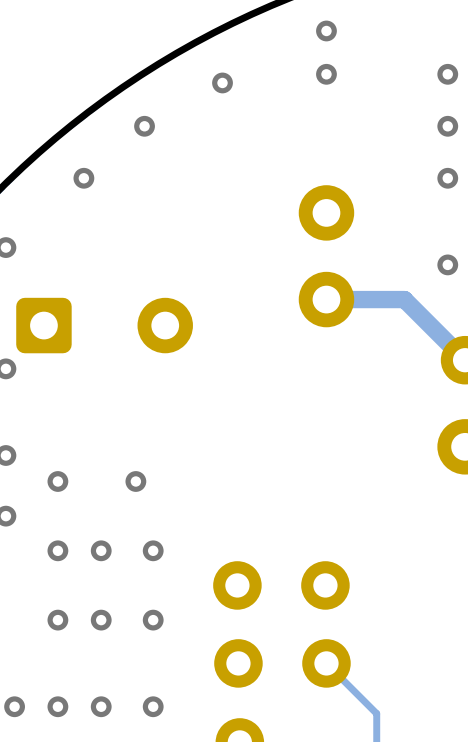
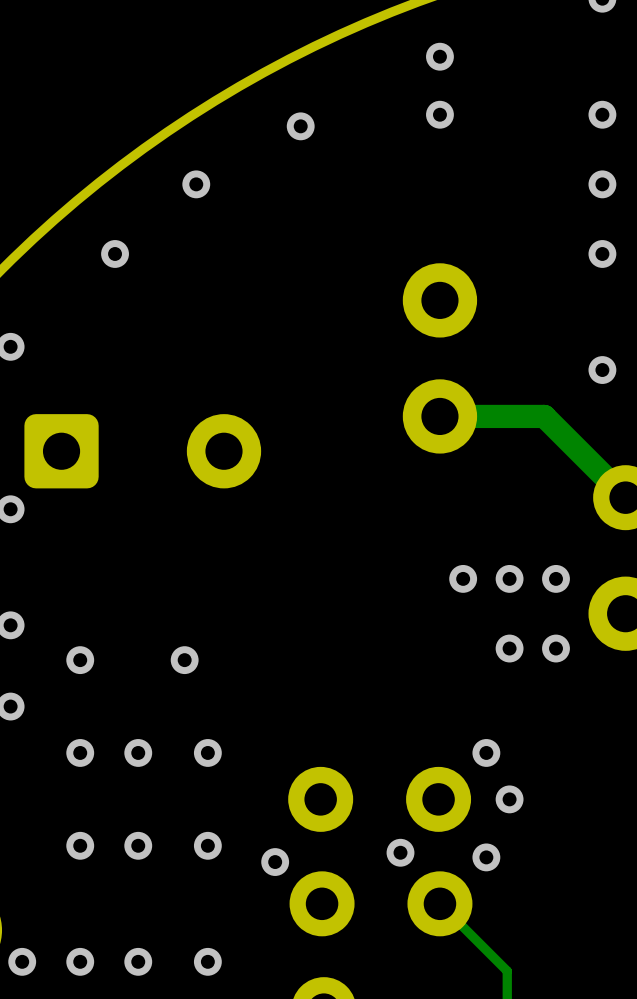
via: none -> (463, 578)
via: none -> (509, 578)
via: none -> (556, 578)
via: none -> (509, 648)
via: none -> (556, 648)
via: none -> (486, 752)
via: none -> (509, 799)
via: none -> (400, 852)
via: none -> (486, 857)
via: none -> (275, 862)

